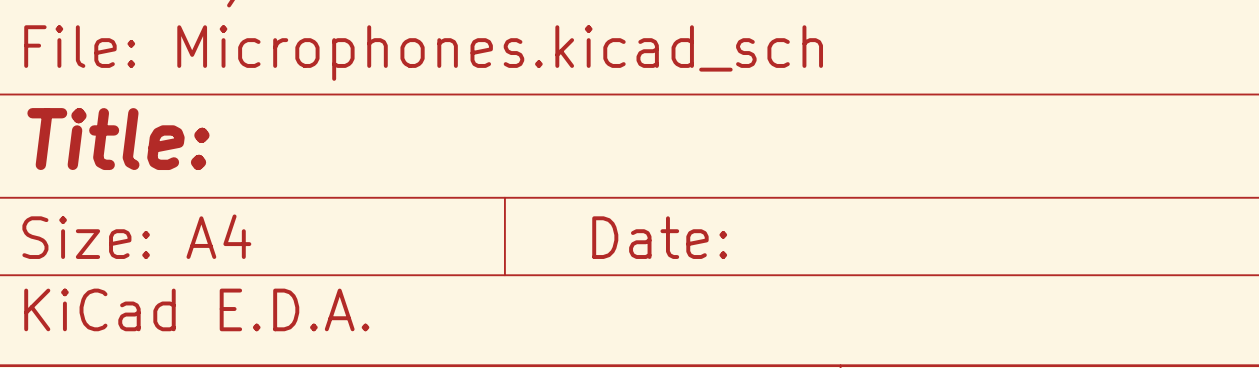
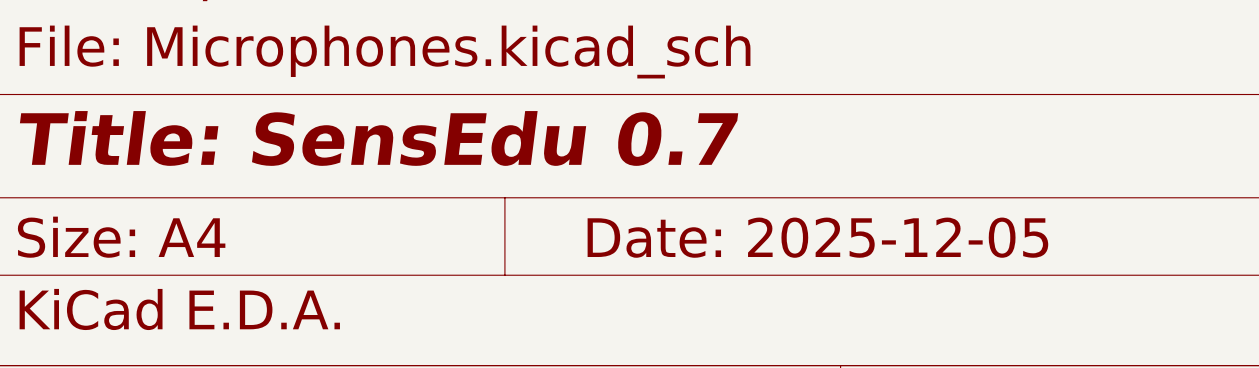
title block: Title: (118, 139) -> Title: SensEdu 0.7 (379, 138)
title block: Date: (659, 237) -> Date: 2025-12-05 (817, 237)

